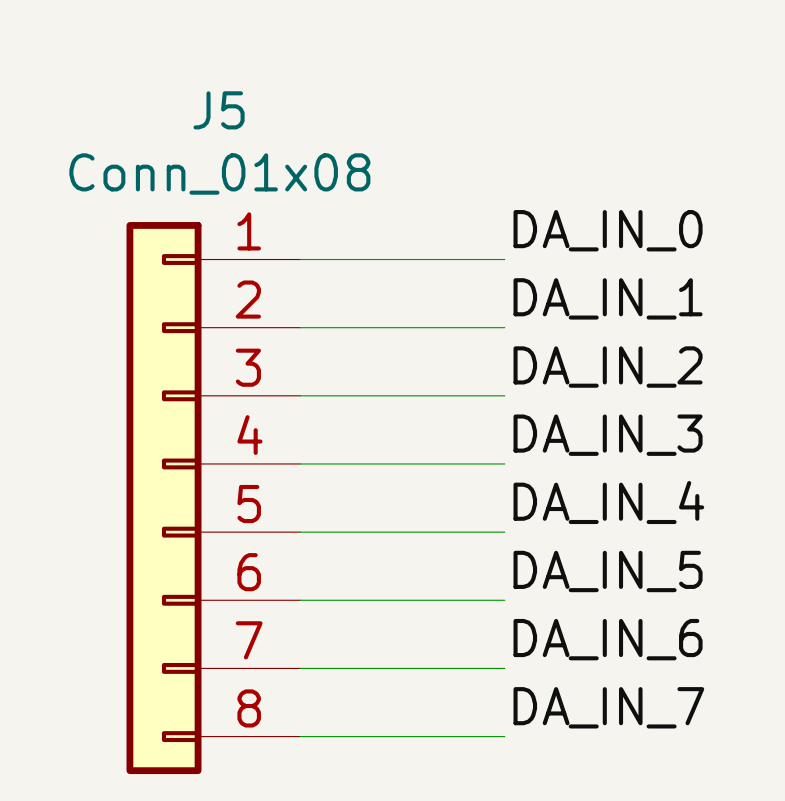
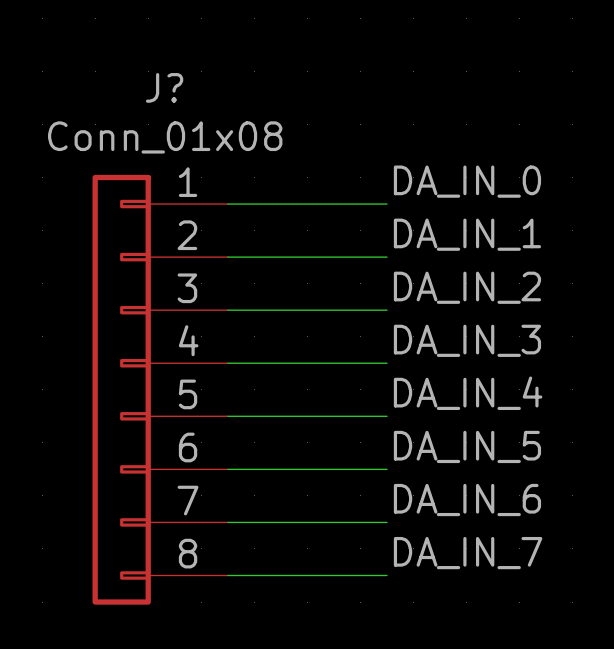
J5 name: J5 (219, 110) -> J? (164, 87)

